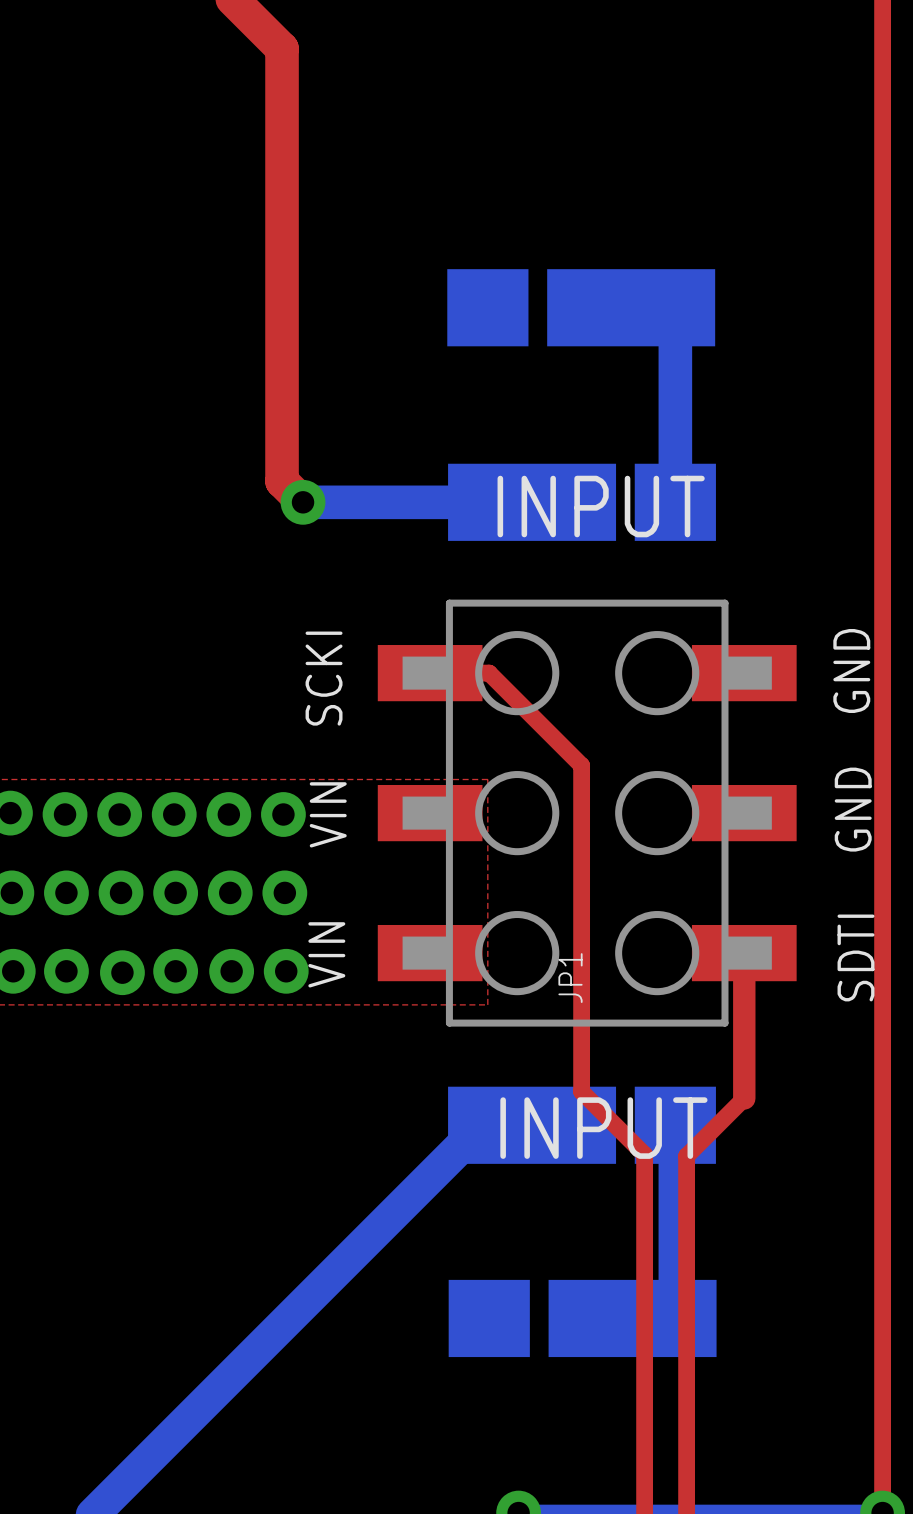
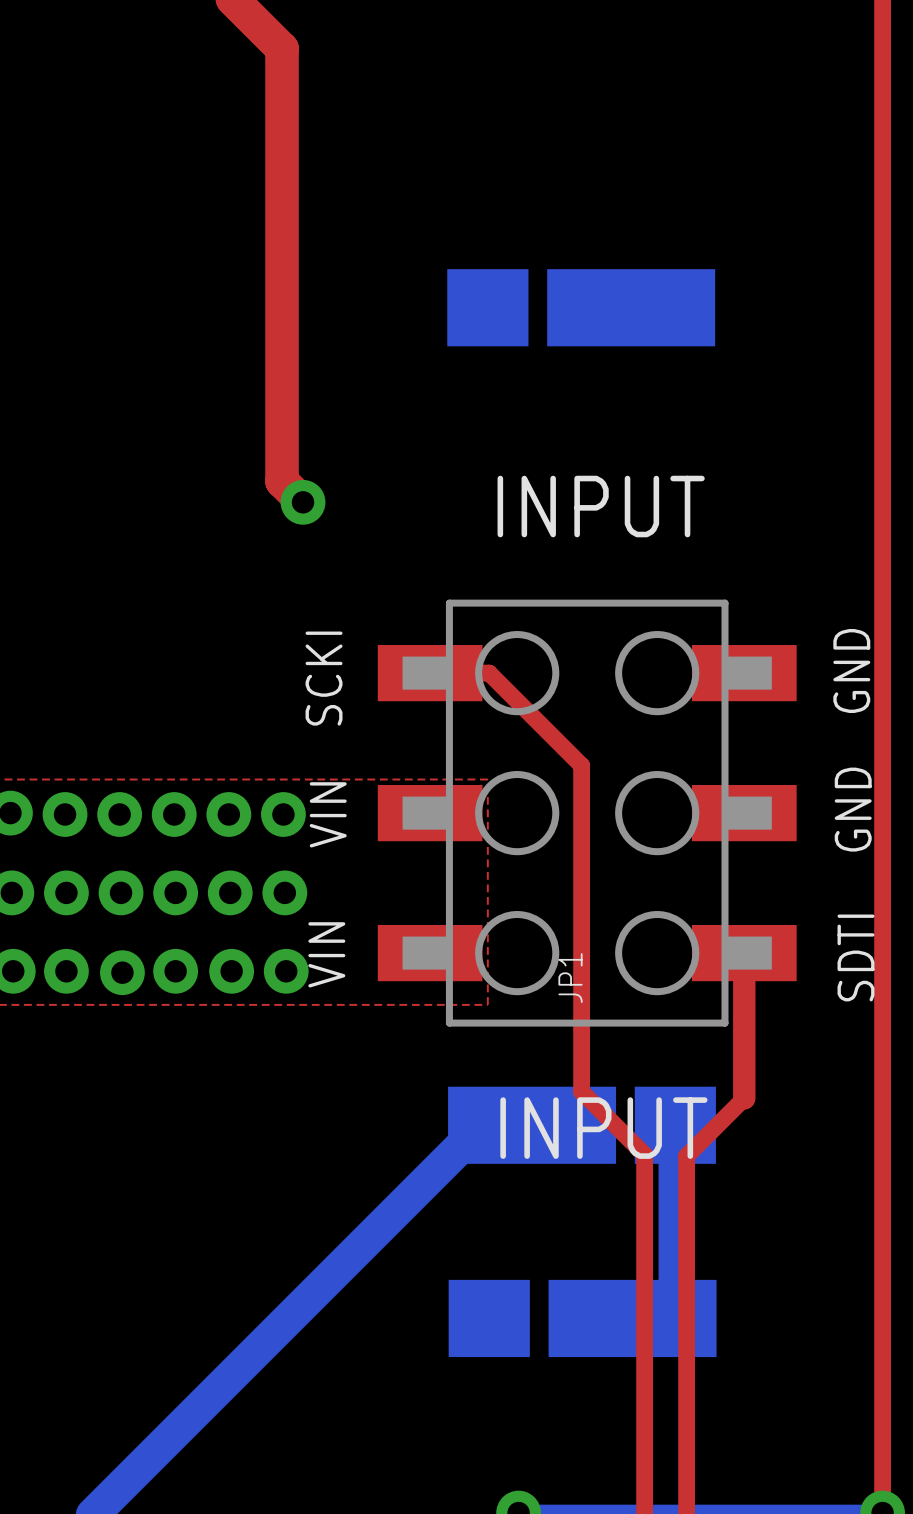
bottom track: (631, 307) (669, 306) (675, 311) (675, 502) -> none
bottom track: (303, 502) (532, 502) -> none
part: (582, 502) -> none

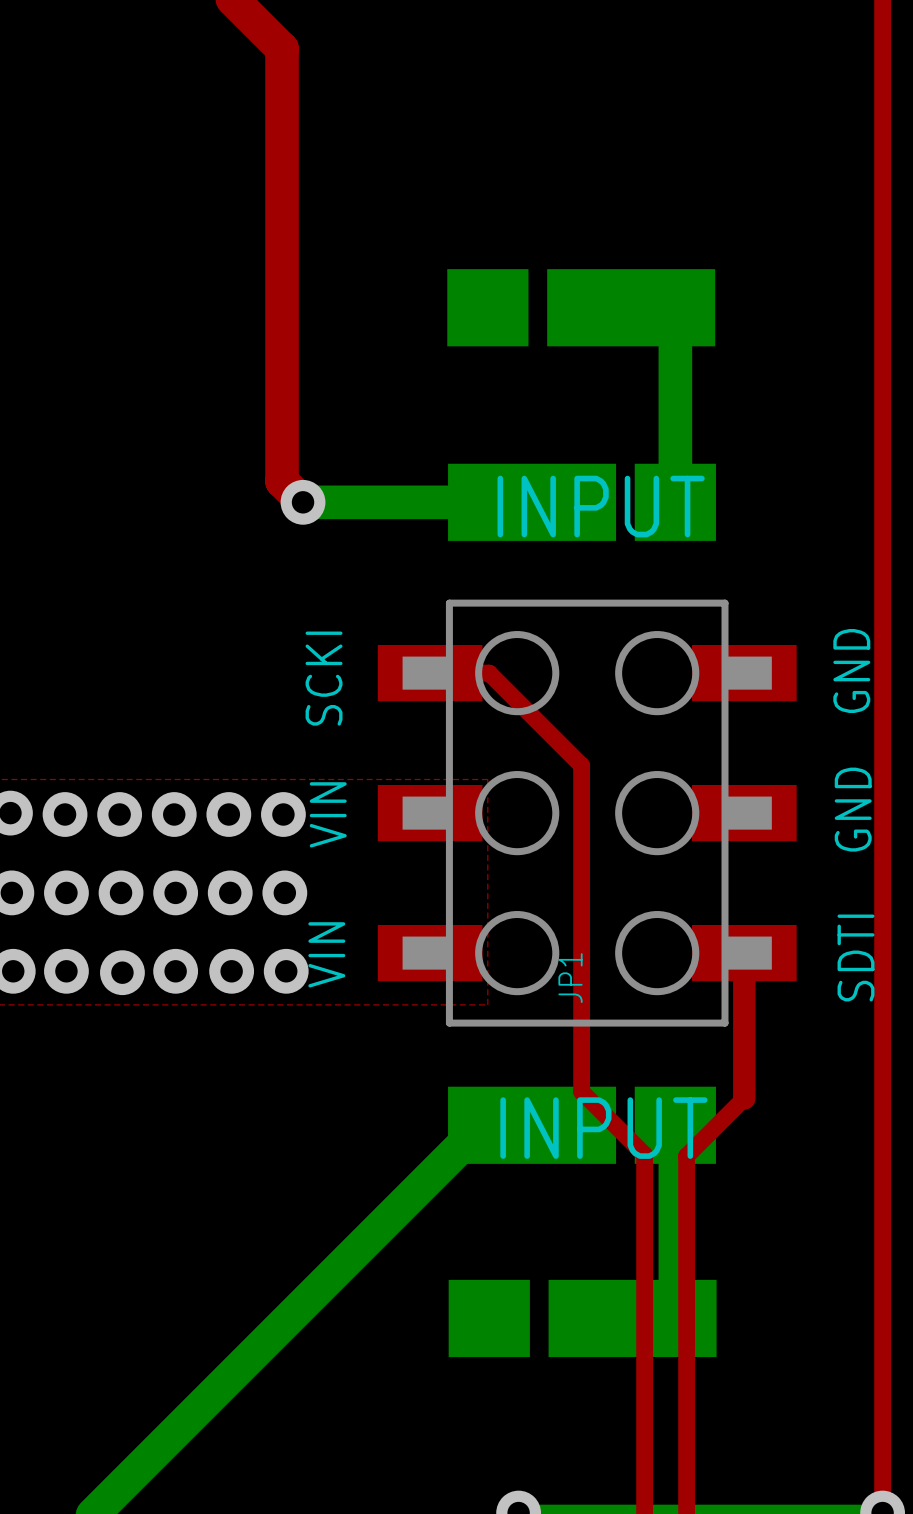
bottom track: none -> (631, 307) (669, 306) (675, 311) (675, 502)
bottom track: none -> (303, 502) (532, 502)
part: none -> (582, 502)

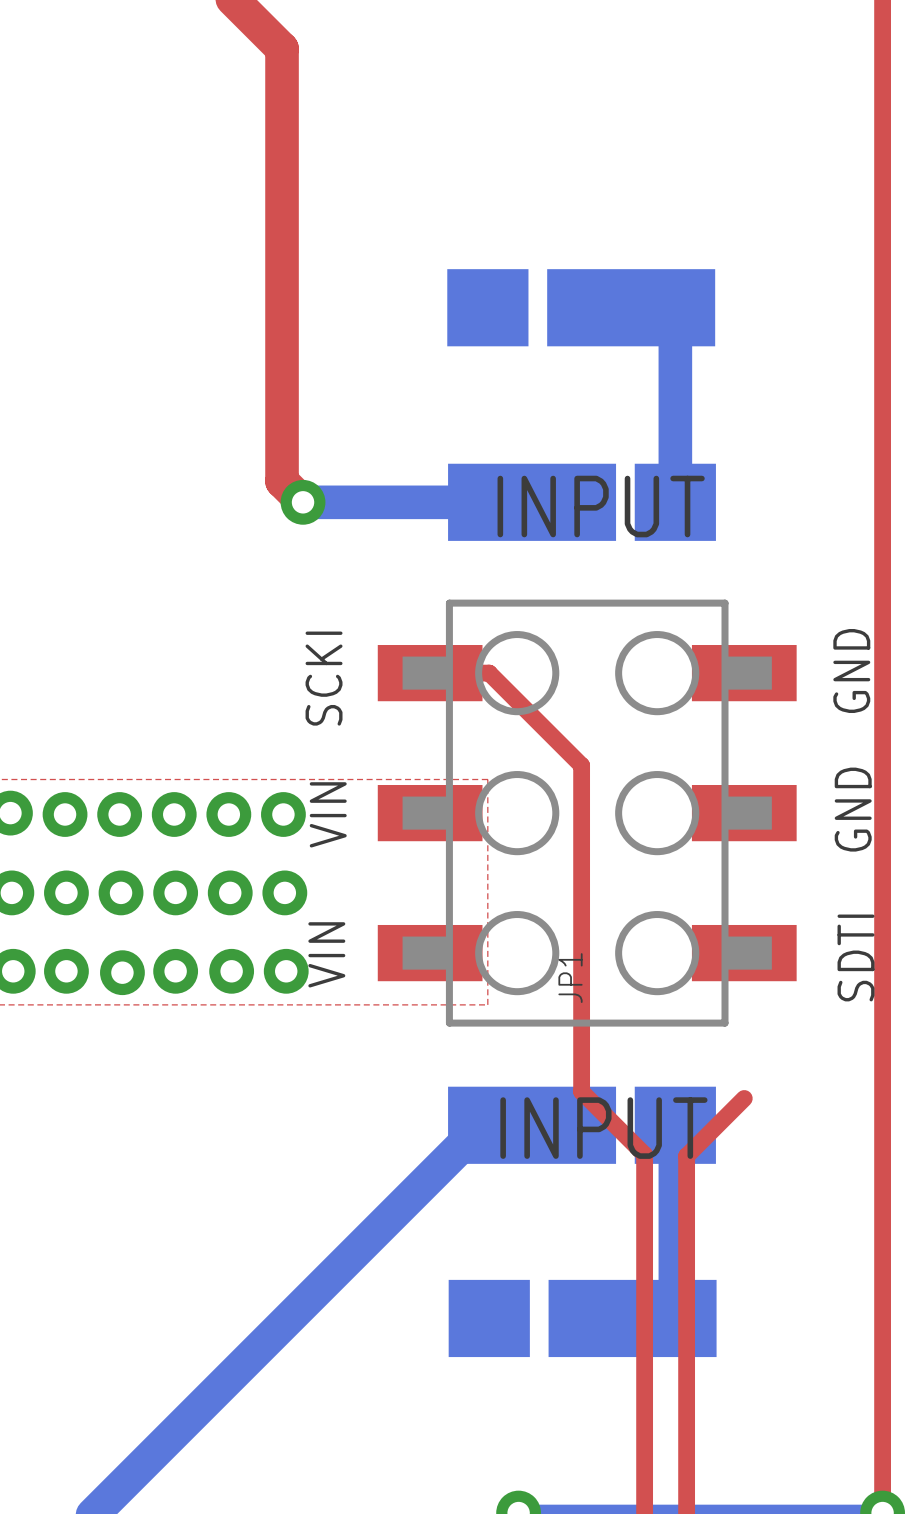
top track: (744, 953) (744, 1098) -> none

